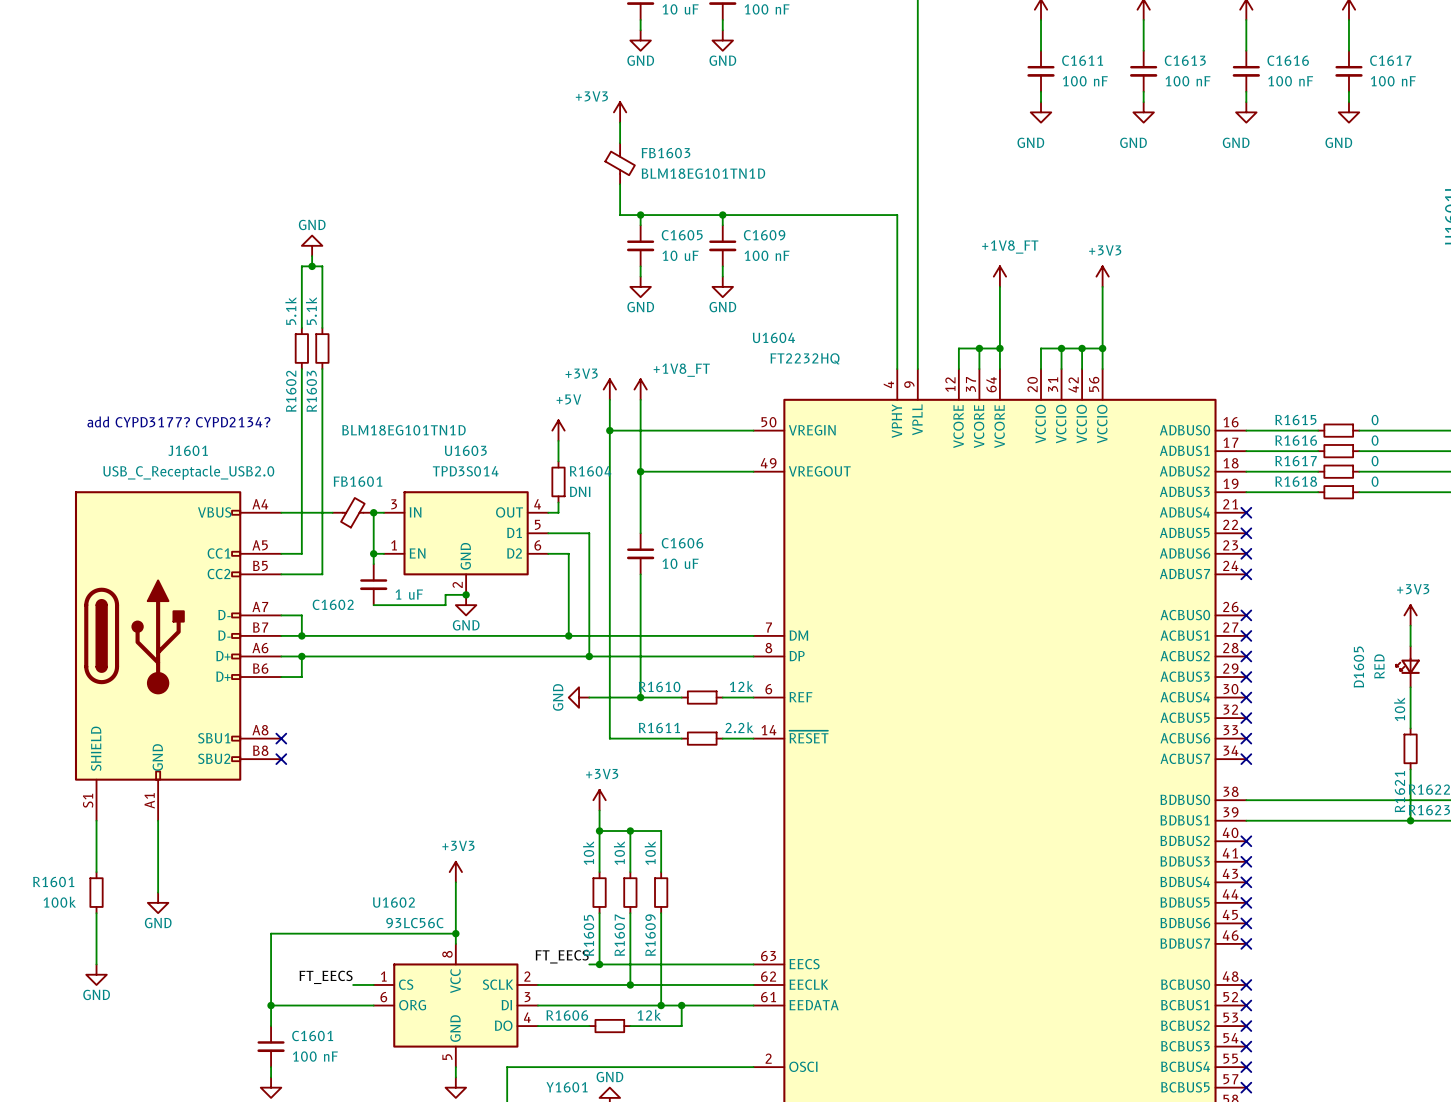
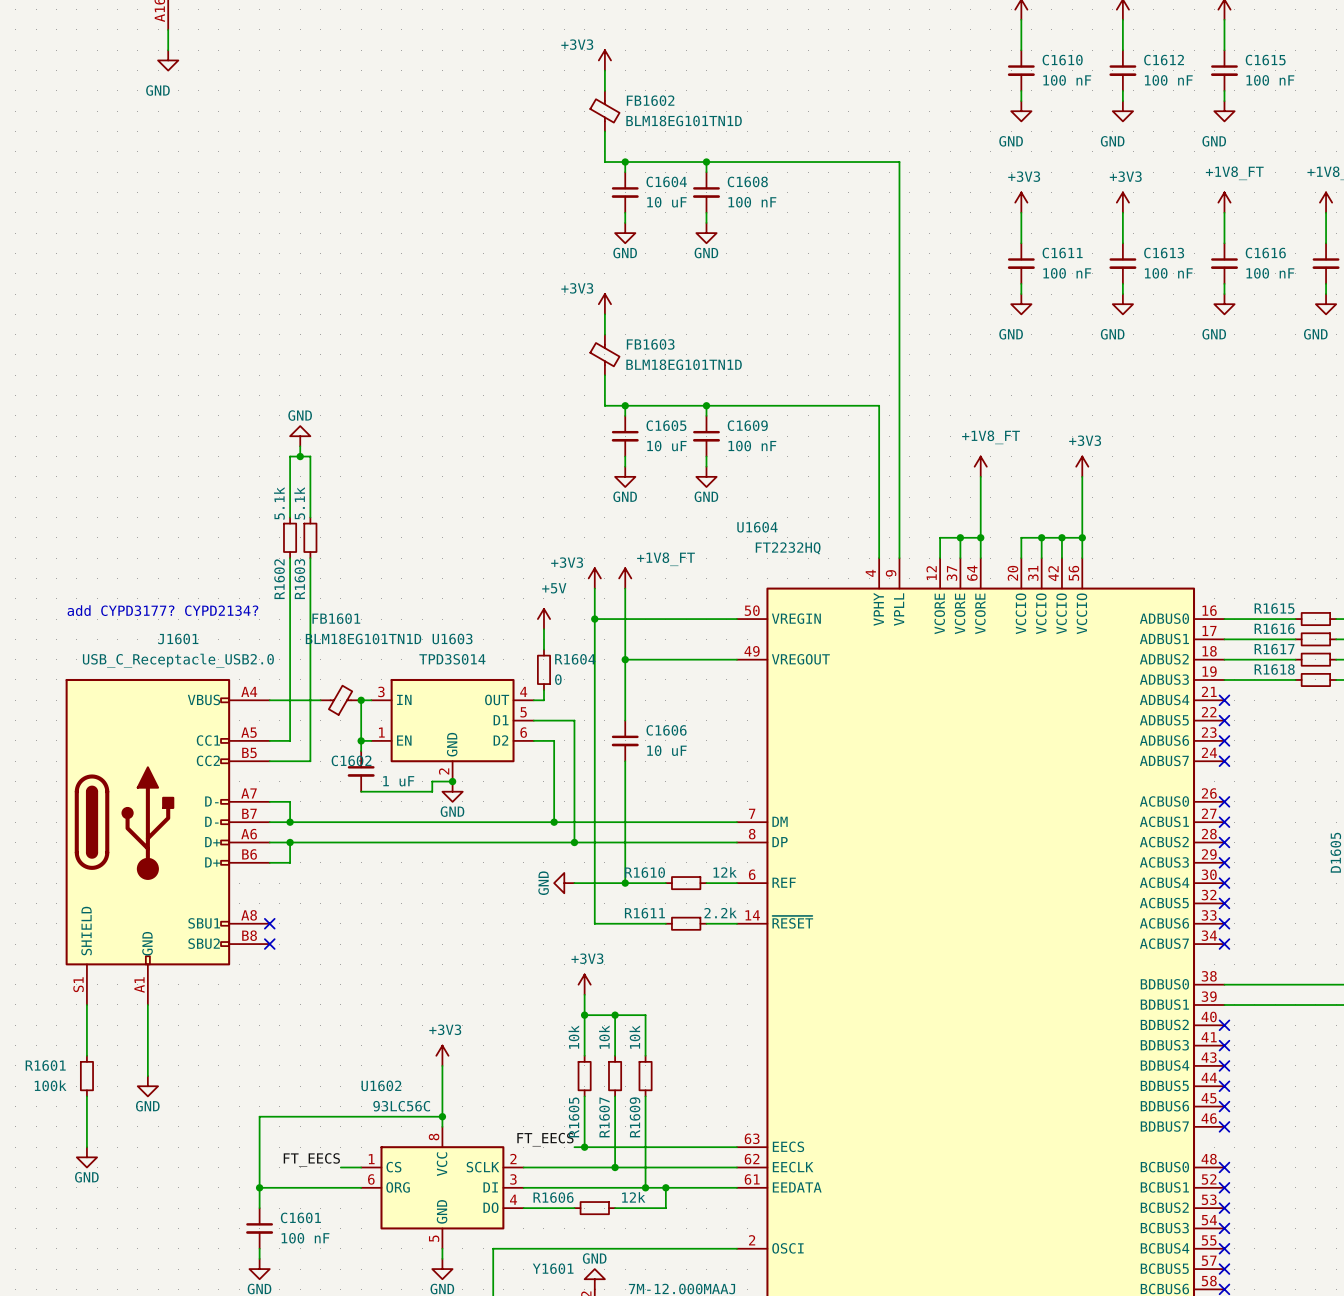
FB1601 value position: BLM18EG101TN1D (403, 430) -> BLM18EG101TN1D (363, 638)
FB1601 name position: FB1601 (358, 481) -> FB1601 (336, 618)
R1604 value: DNI (580, 491) -> 0 (558, 679)
C1602 name position: C1602 (333, 604) -> C1602 (351, 760)

